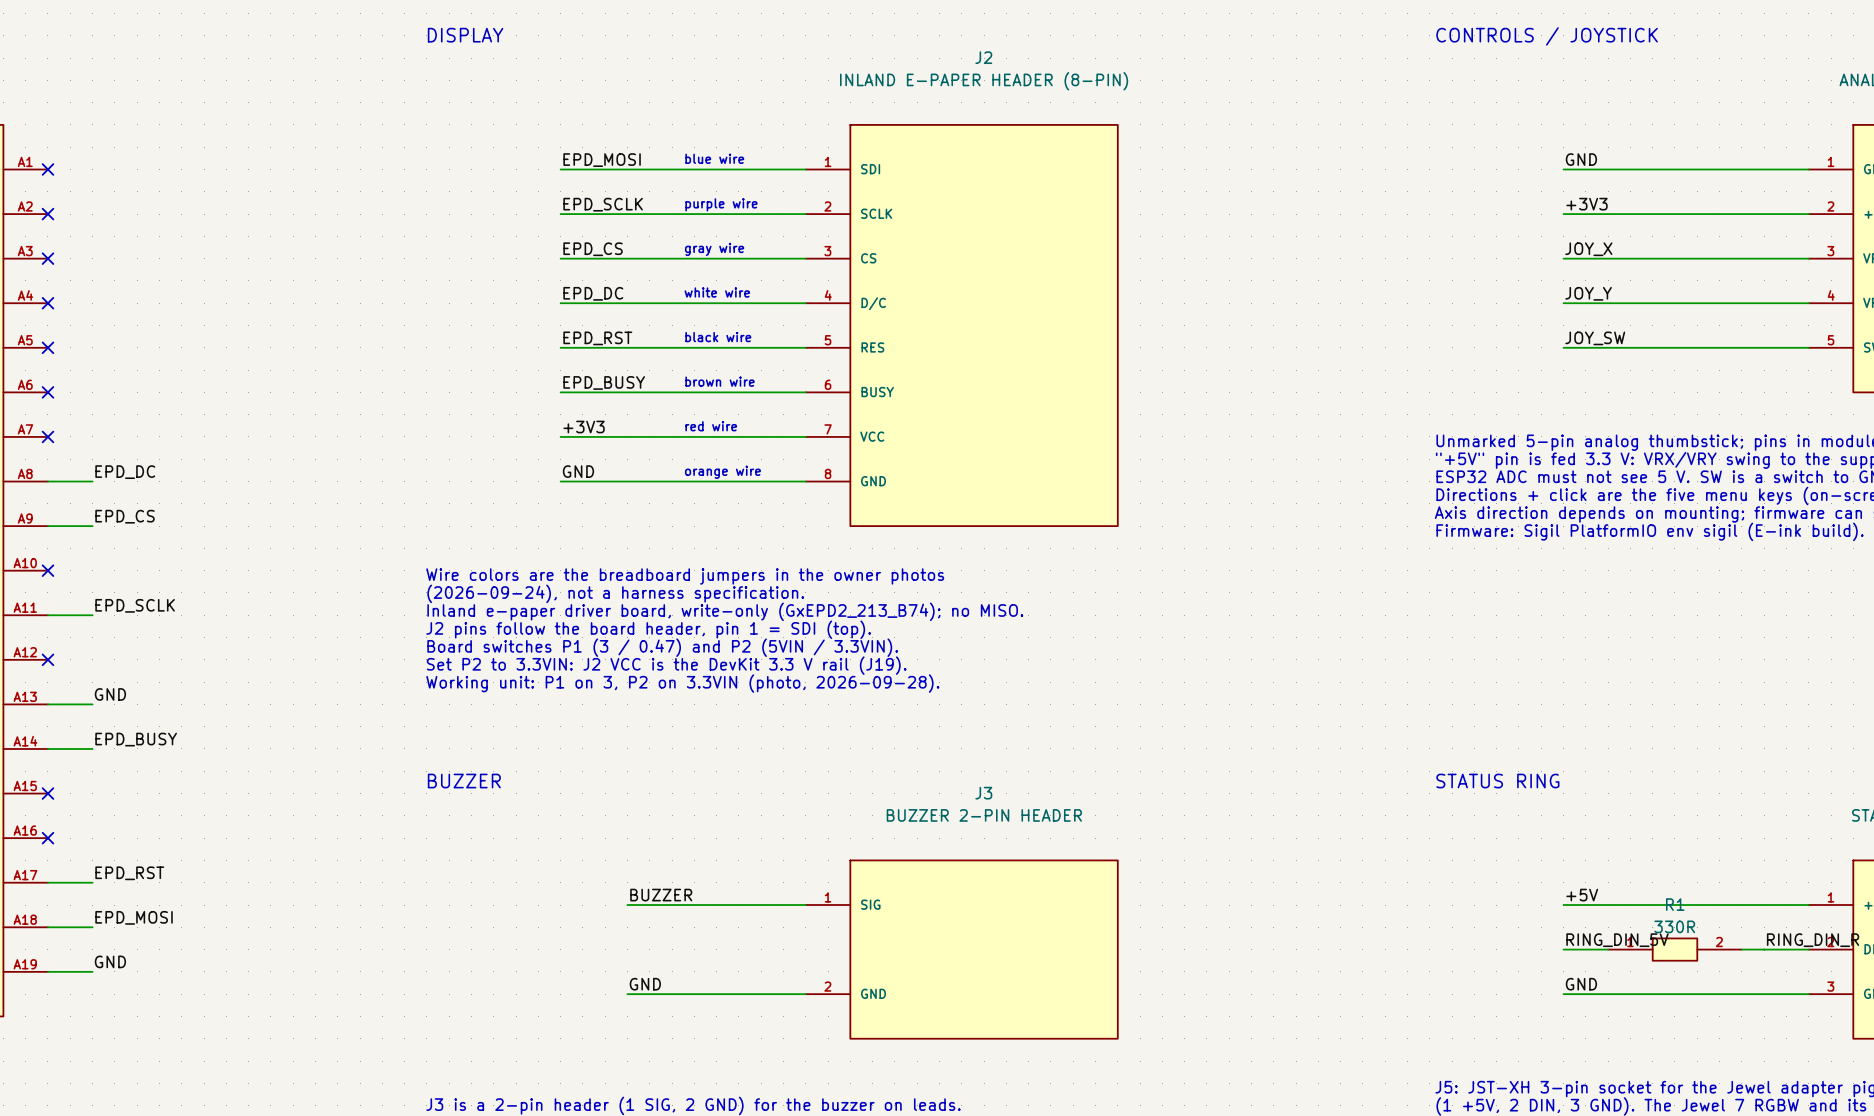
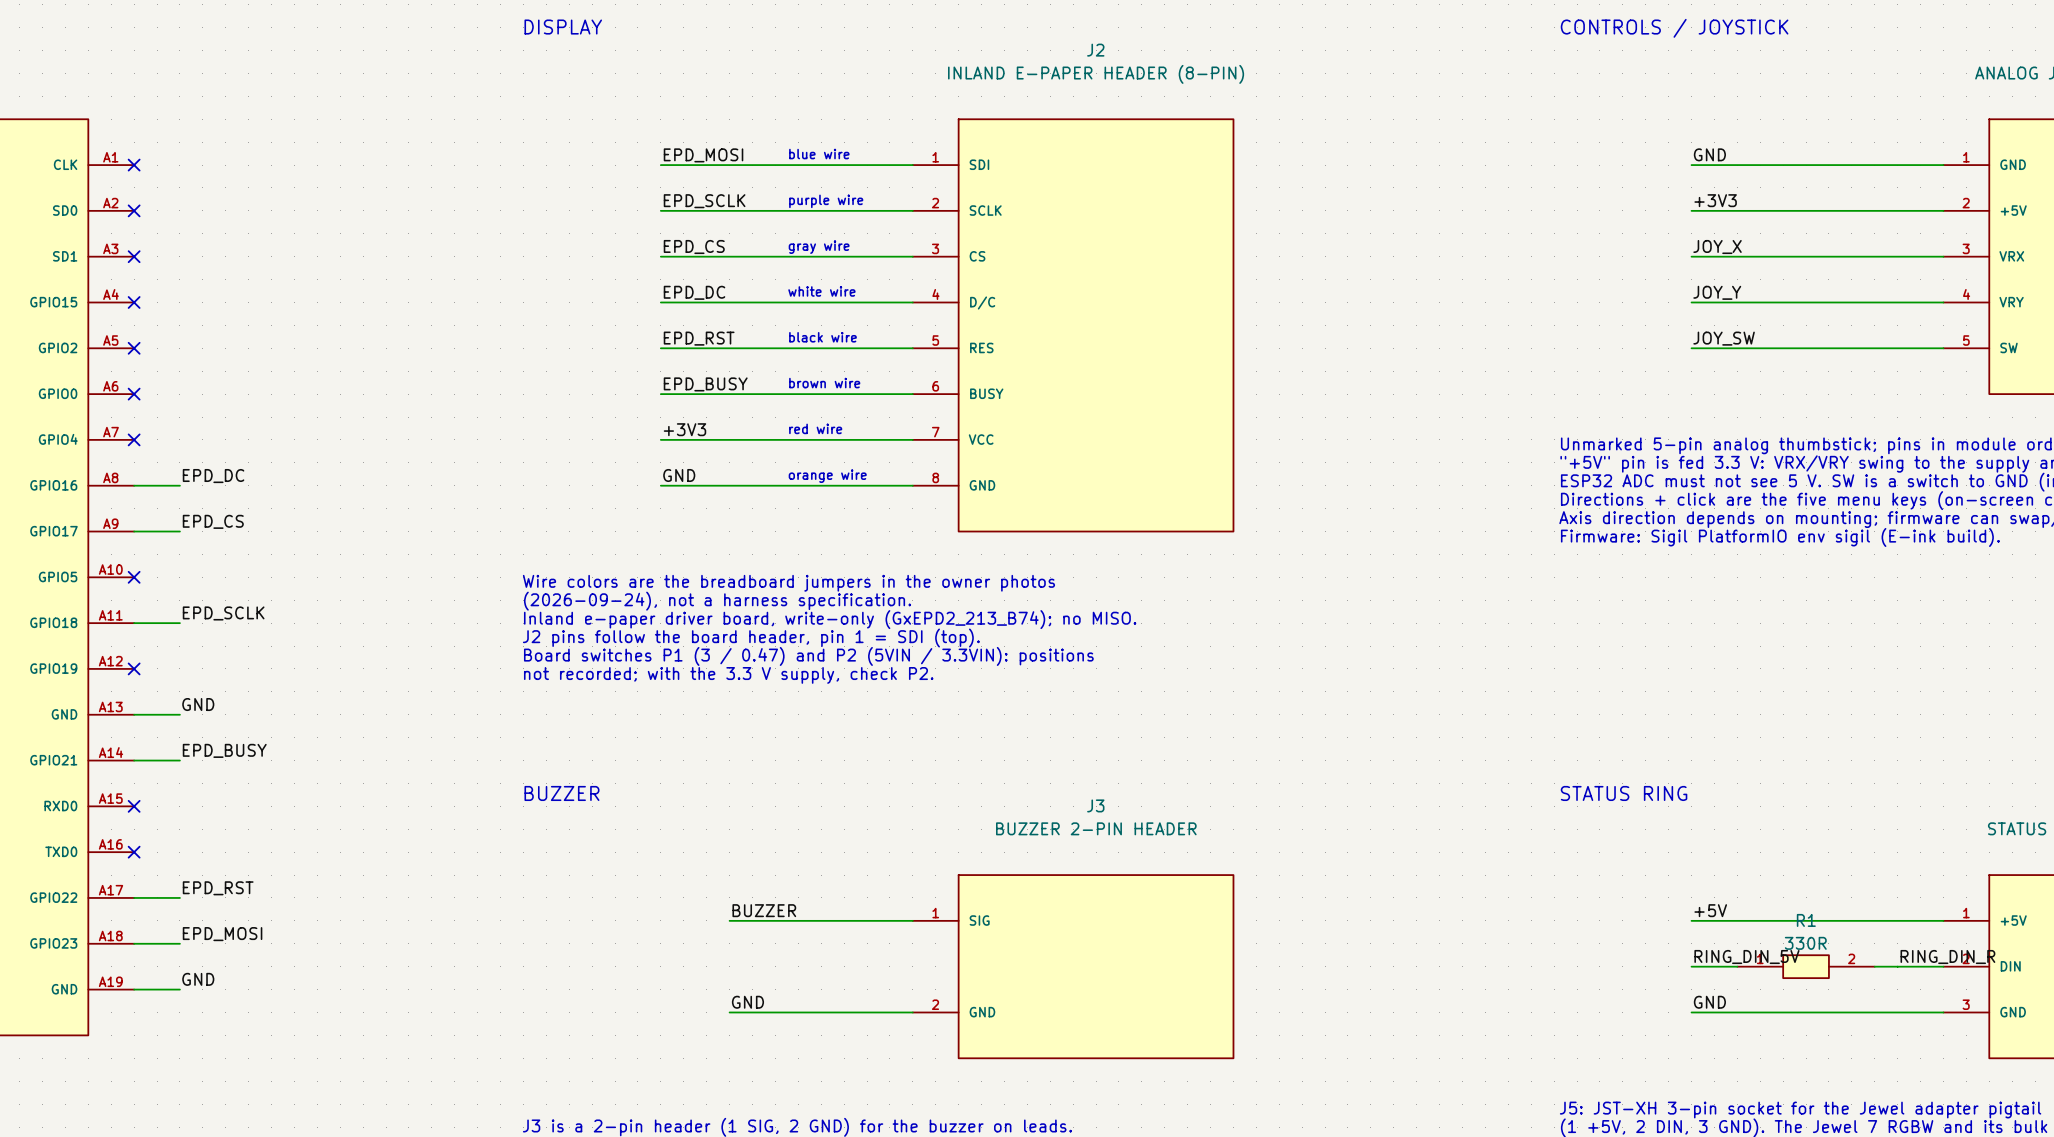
text: Board switches P1 (3 / 0.47) and P2 (5VIN / 3.3VIN). (662, 647) -> Board switches P1 (3 / 0.47) and P2 (5VIN / 3.3VIN): positions (808, 656)
text: Set P2 to 3.3VIN: J2 VCC is the DevKit 3.3 V rail (J19). (666, 665) -> not recorded; with the 3.3 V supply, check P2. (728, 675)
text: Working unit: P1 on 3, P2 on 3.3VIN (photo, 2026-09-28). (682, 683) -> none

